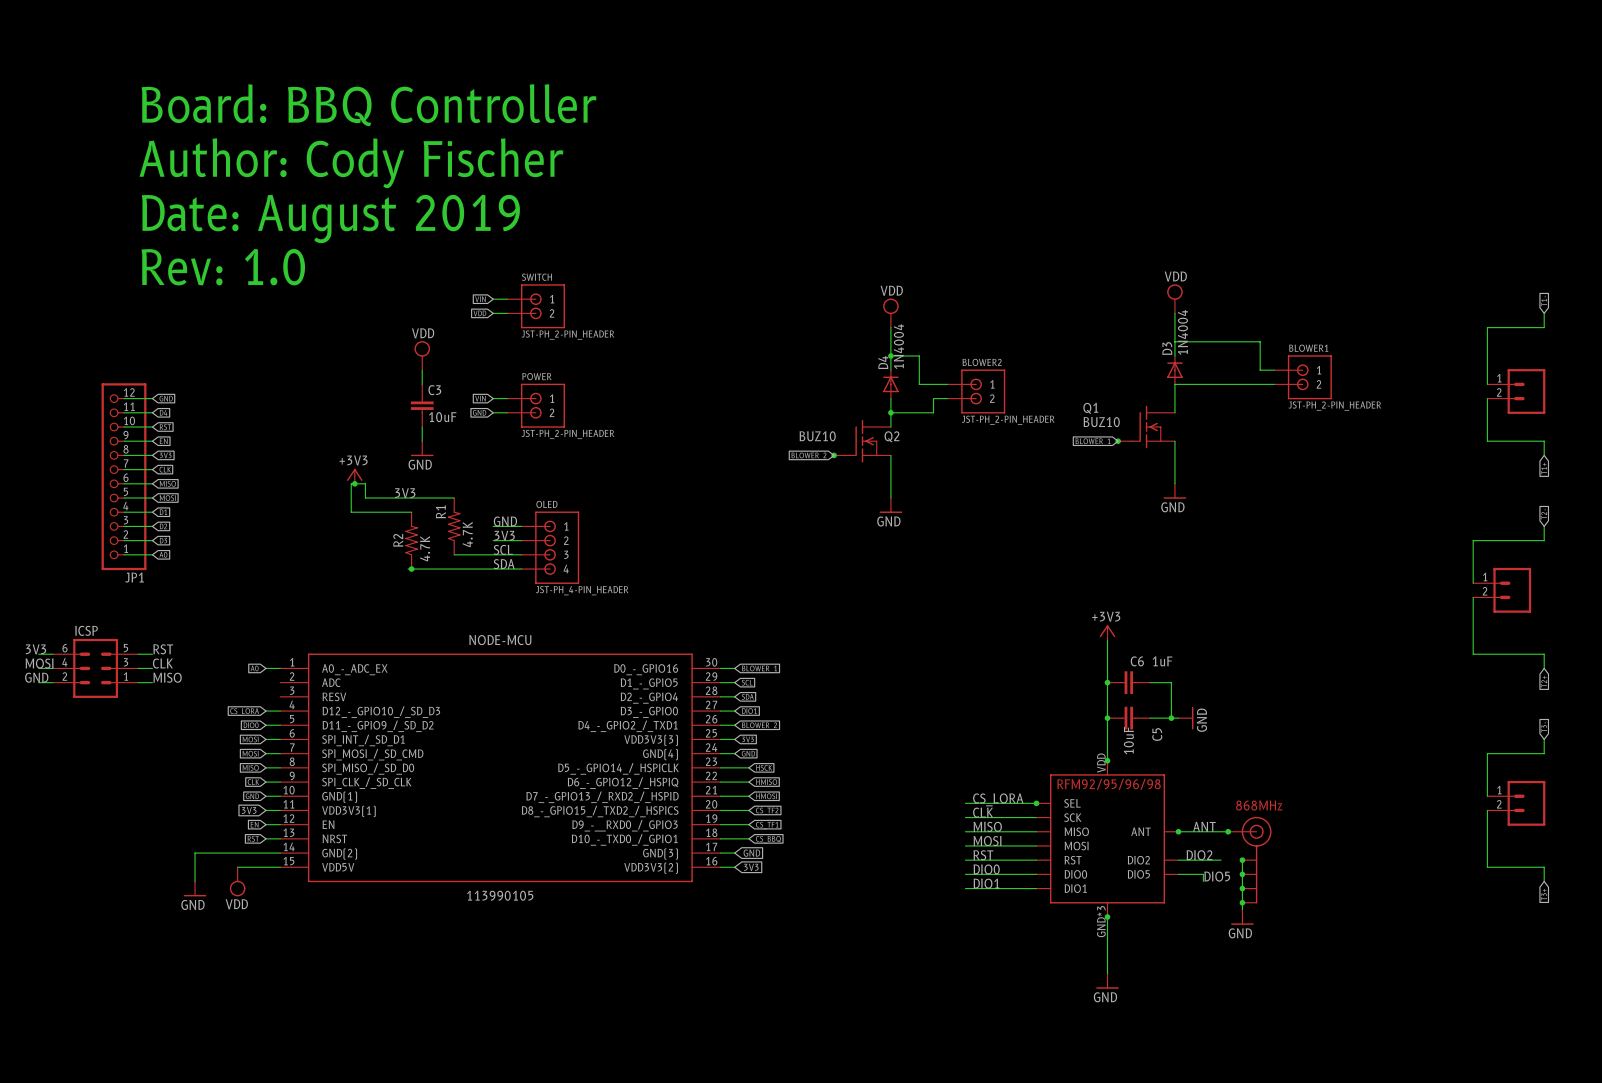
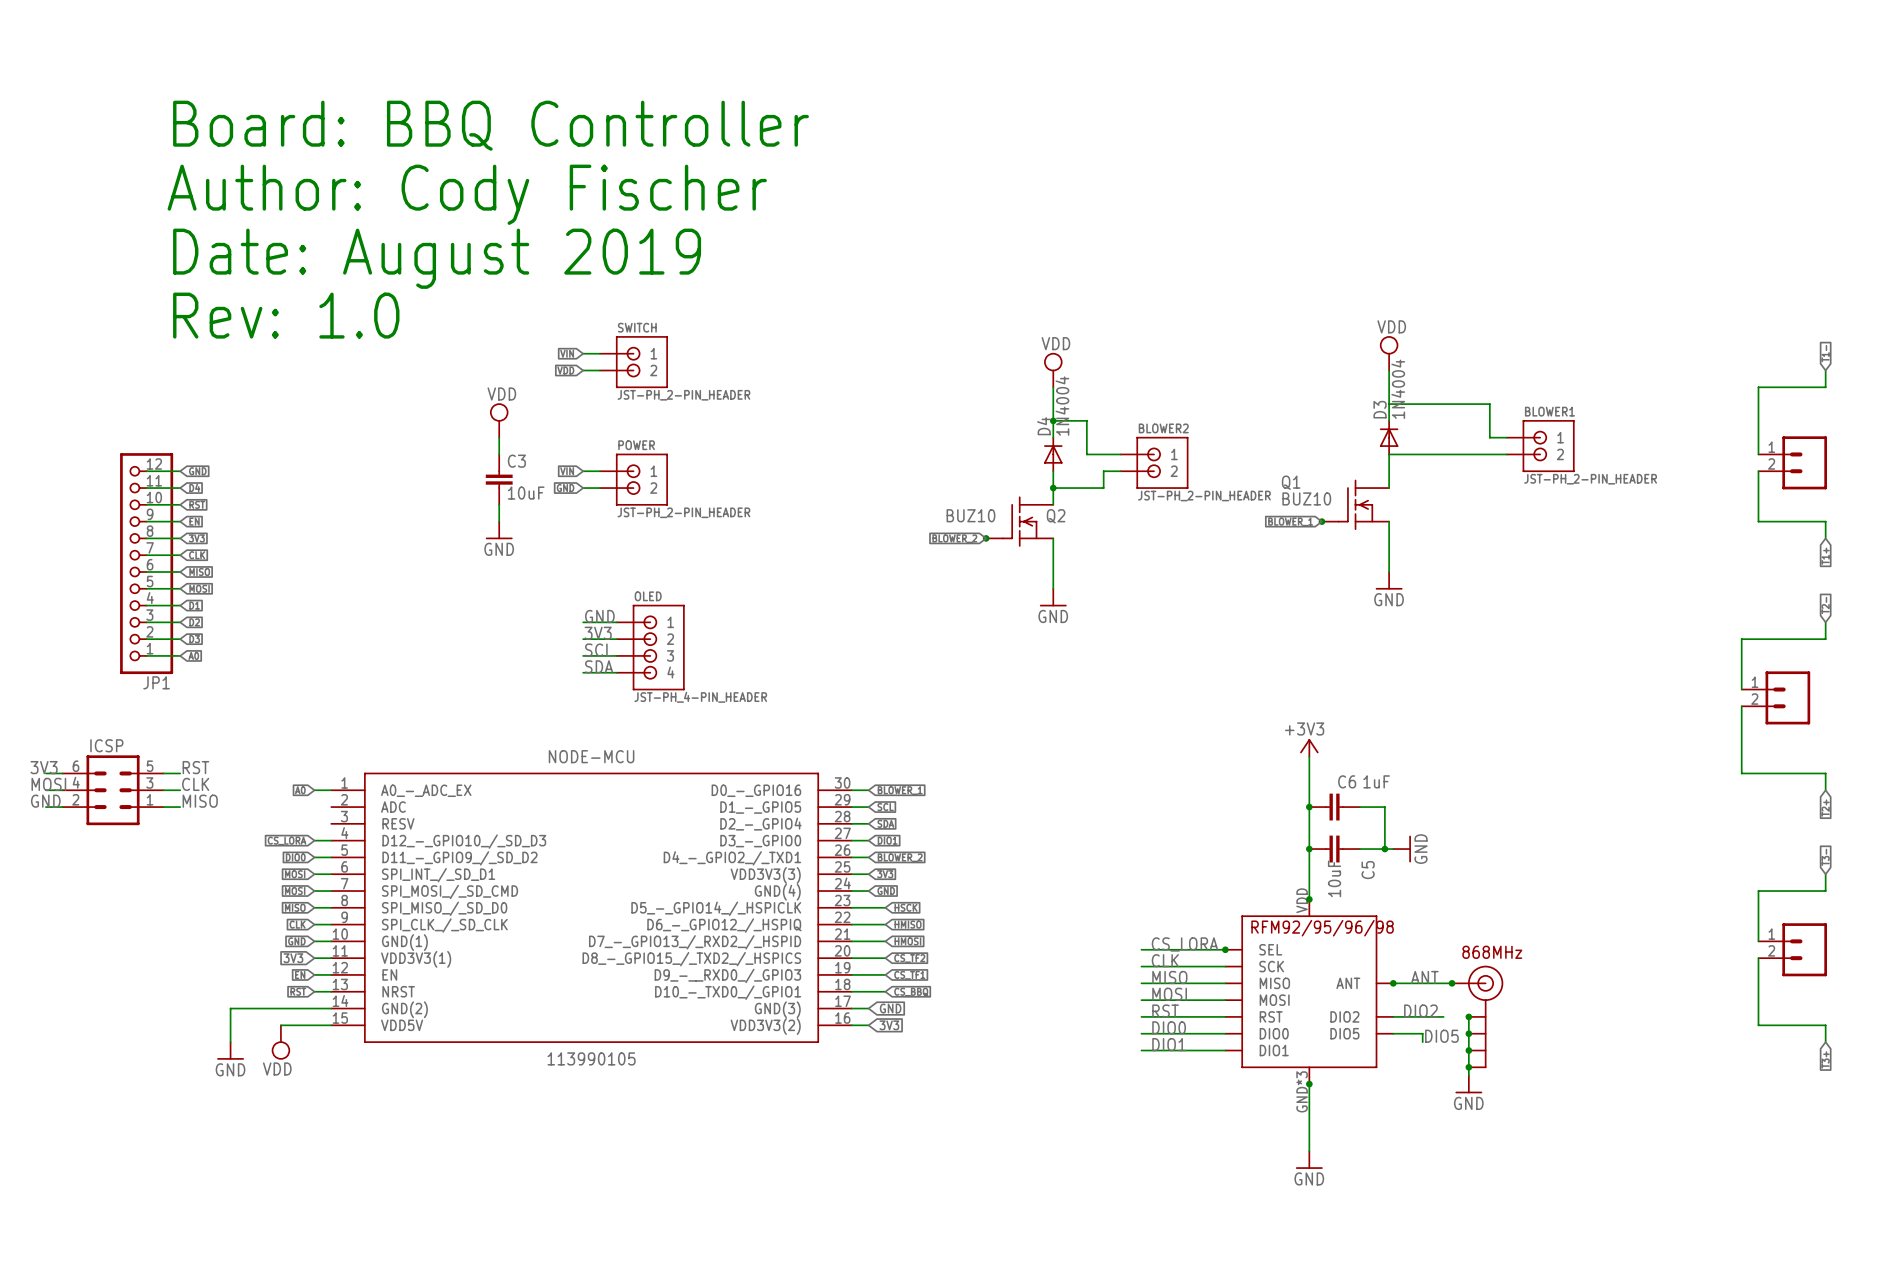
power symbol: +3V3 (354, 476) -> none
junction: (354, 483) -> none
label: 3V3 (405, 493) -> none
wire: (454, 498) (365, 498) (365, 483) (351, 483) (351, 512) (411, 512) -> none
R1: 4.7K (454, 526) -> none
R2: 4.7K (411, 540) -> none
wire: (454, 554) (493, 554) -> none
wire: (408, 569) (493, 569) -> none
junction: (411, 569) -> none

